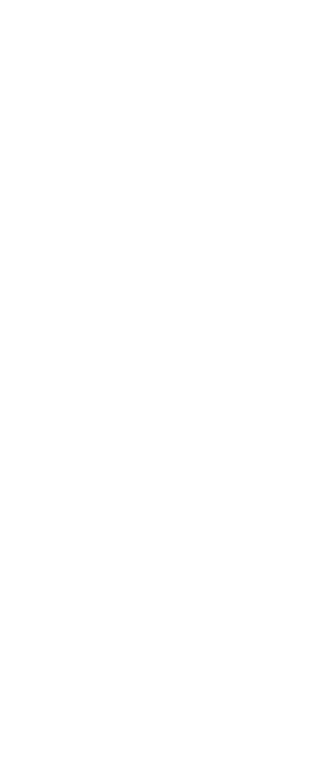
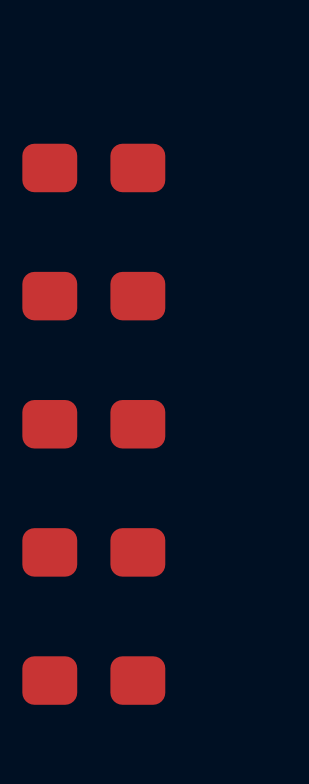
part: none -> (93, 167)
part: none -> (93, 296)
part: none -> (93, 424)
part: none -> (93, 552)
part: none -> (93, 680)

